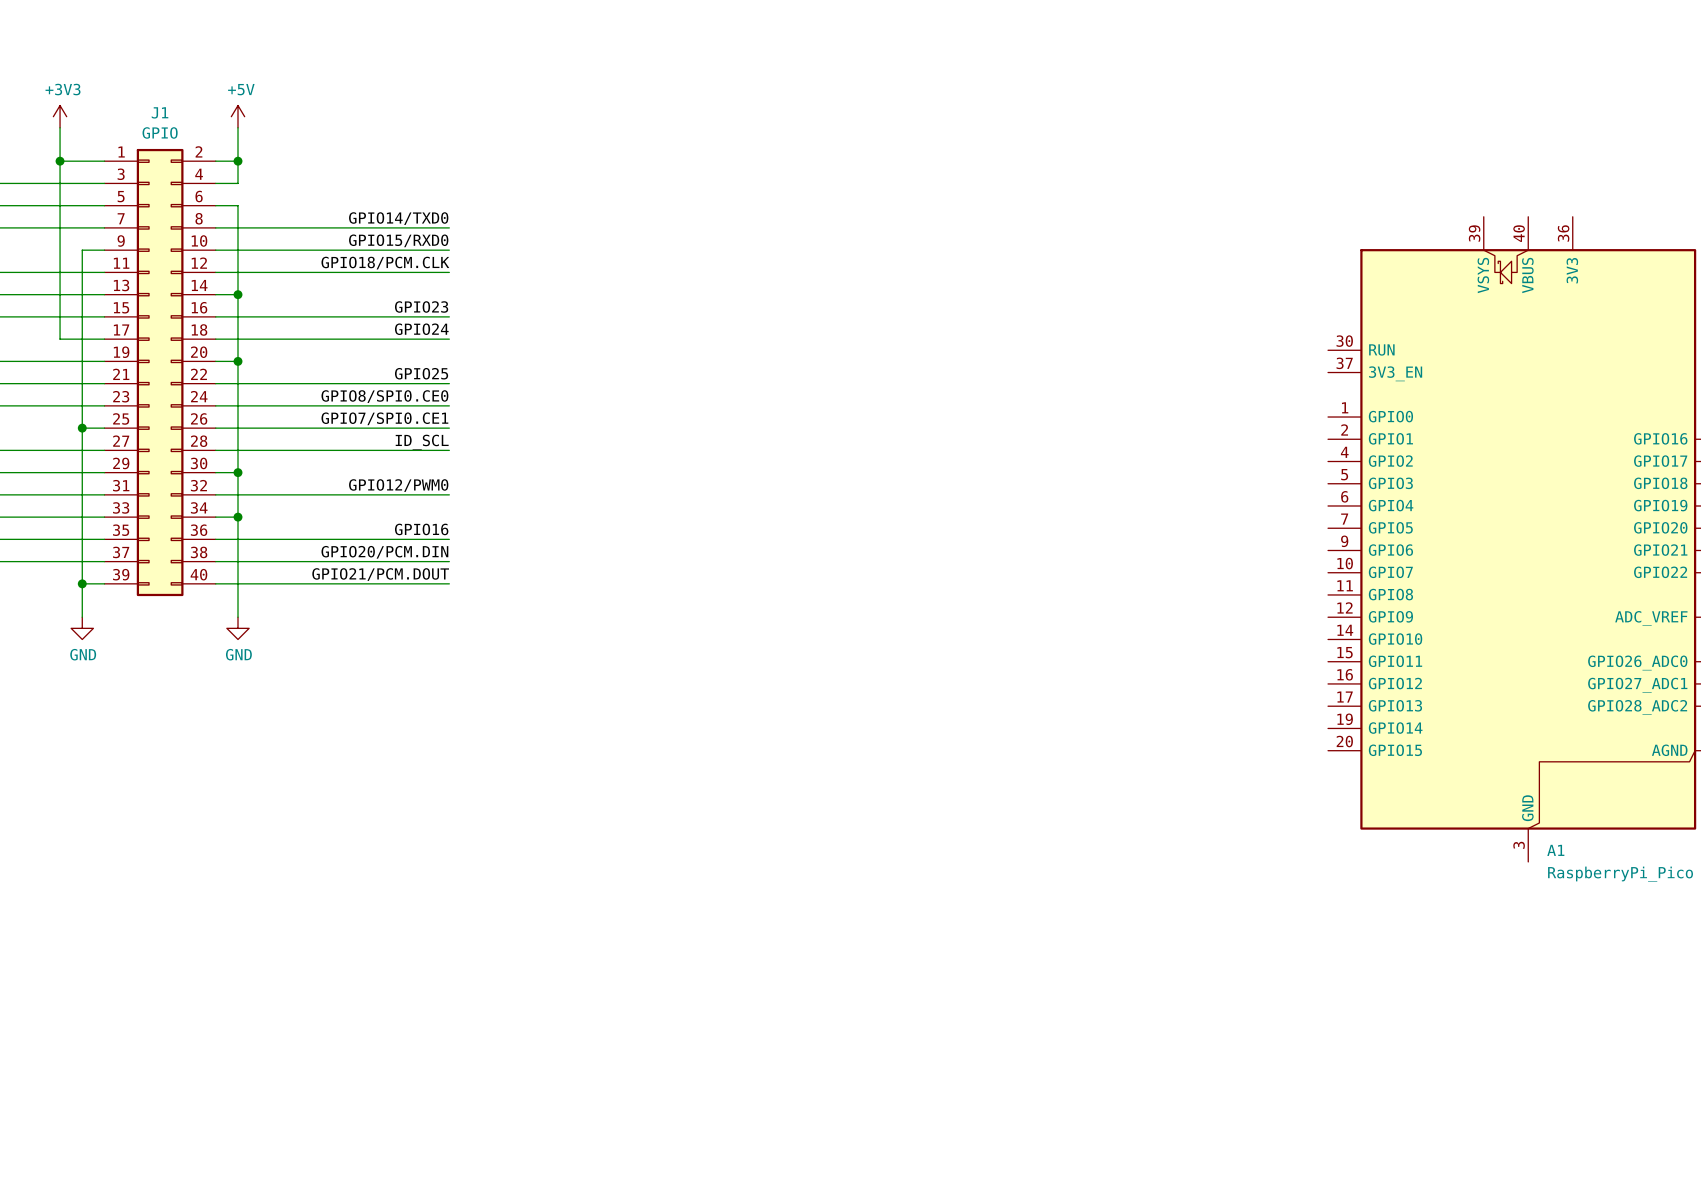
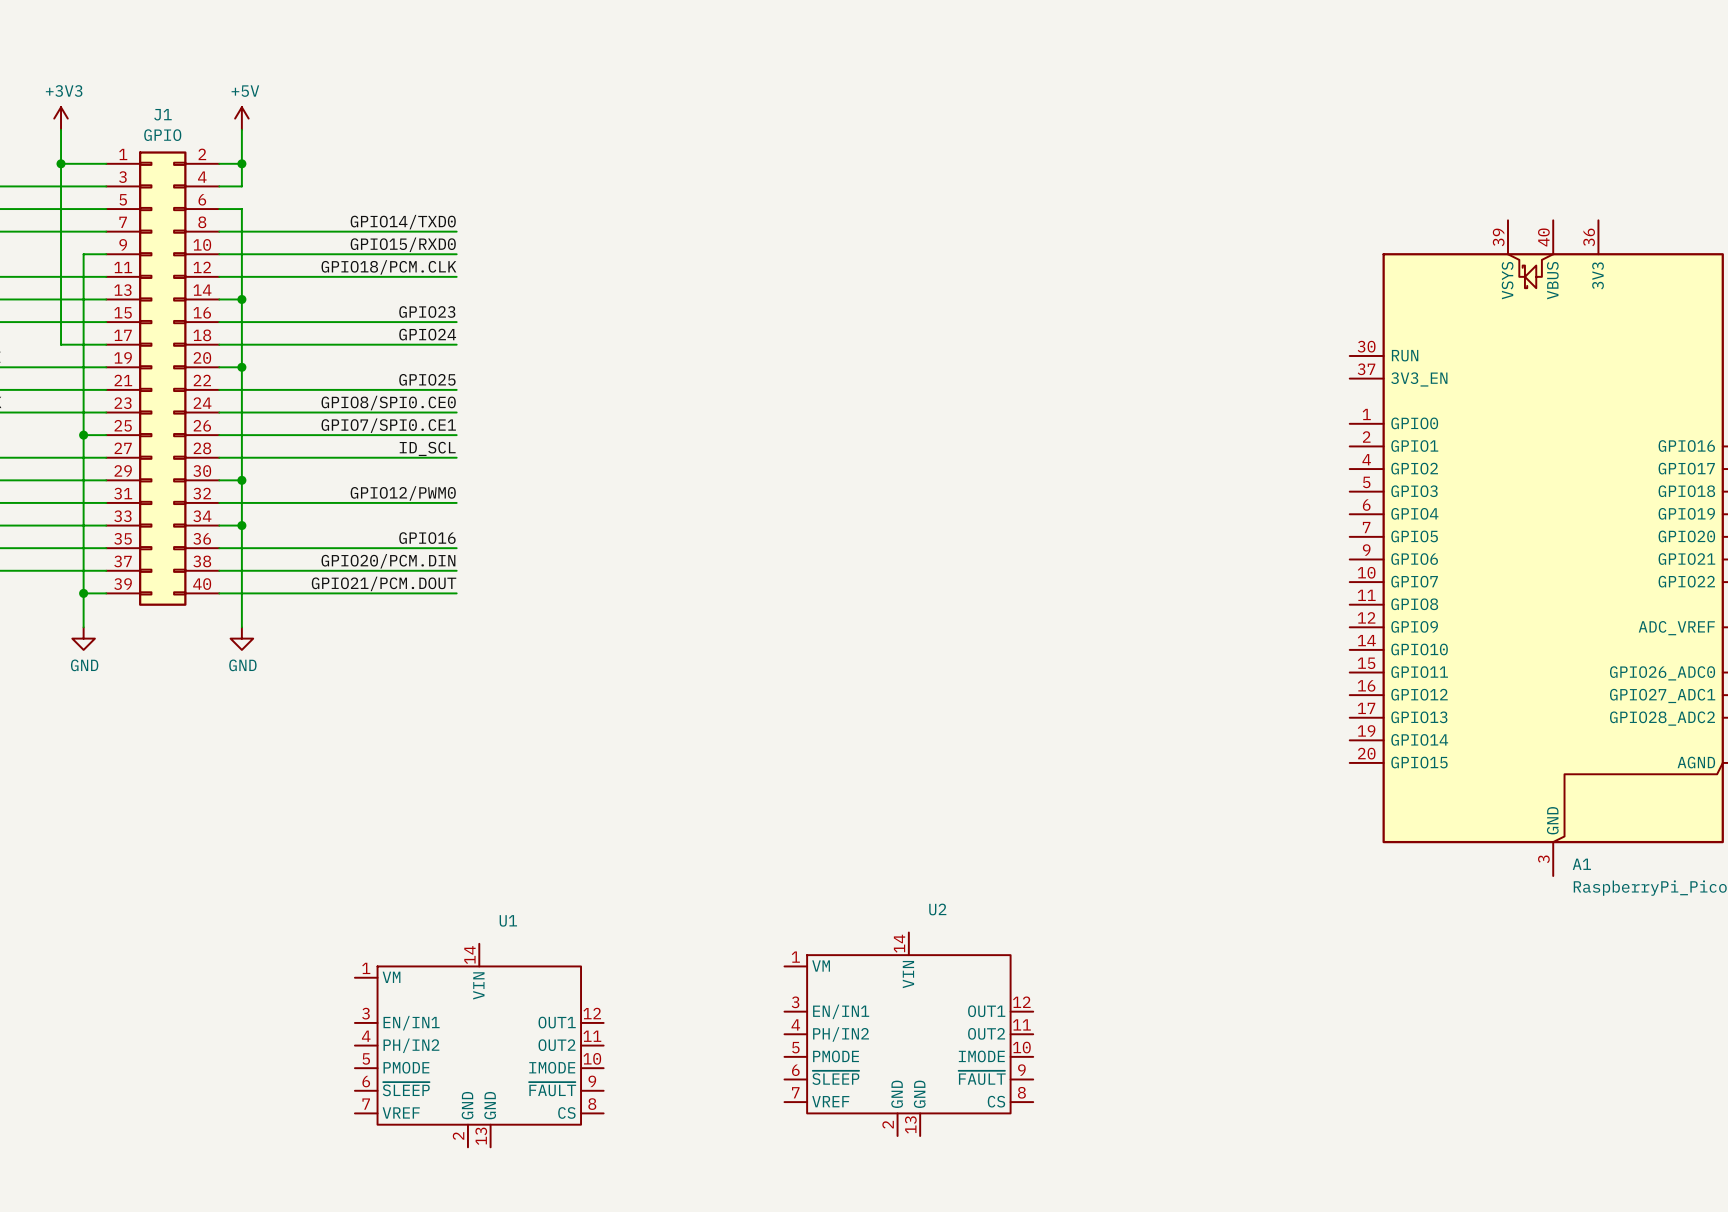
U2: none -> (908, 1034)
U1: none -> (479, 1045)

